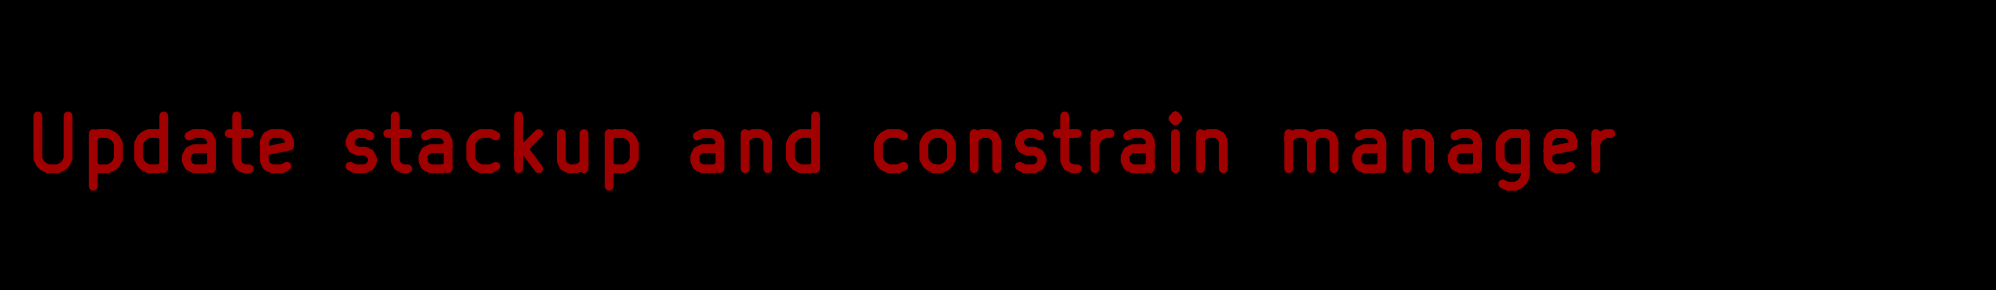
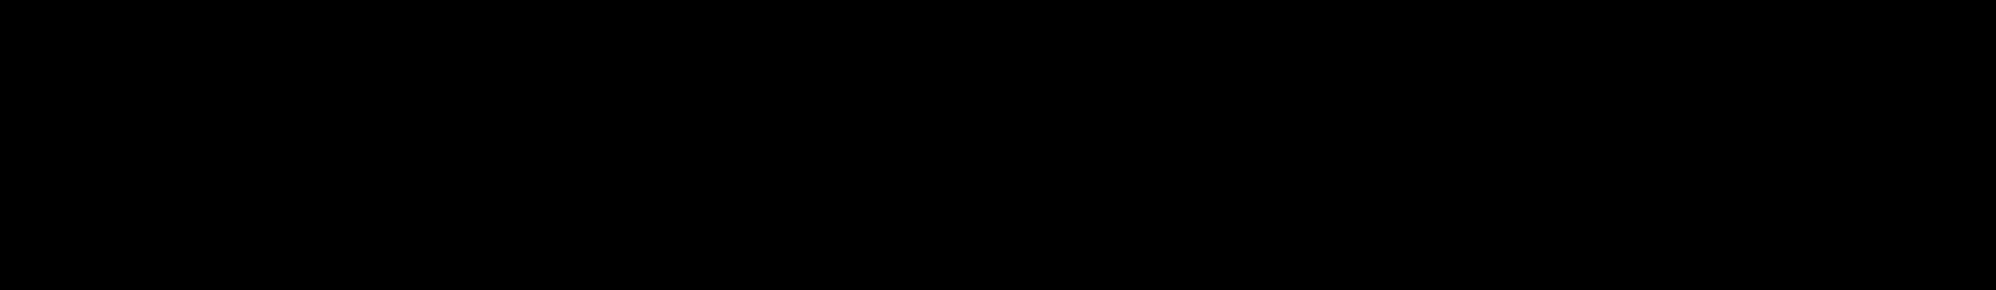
text: Update stackup and constrain manager (824, 151) -> none

